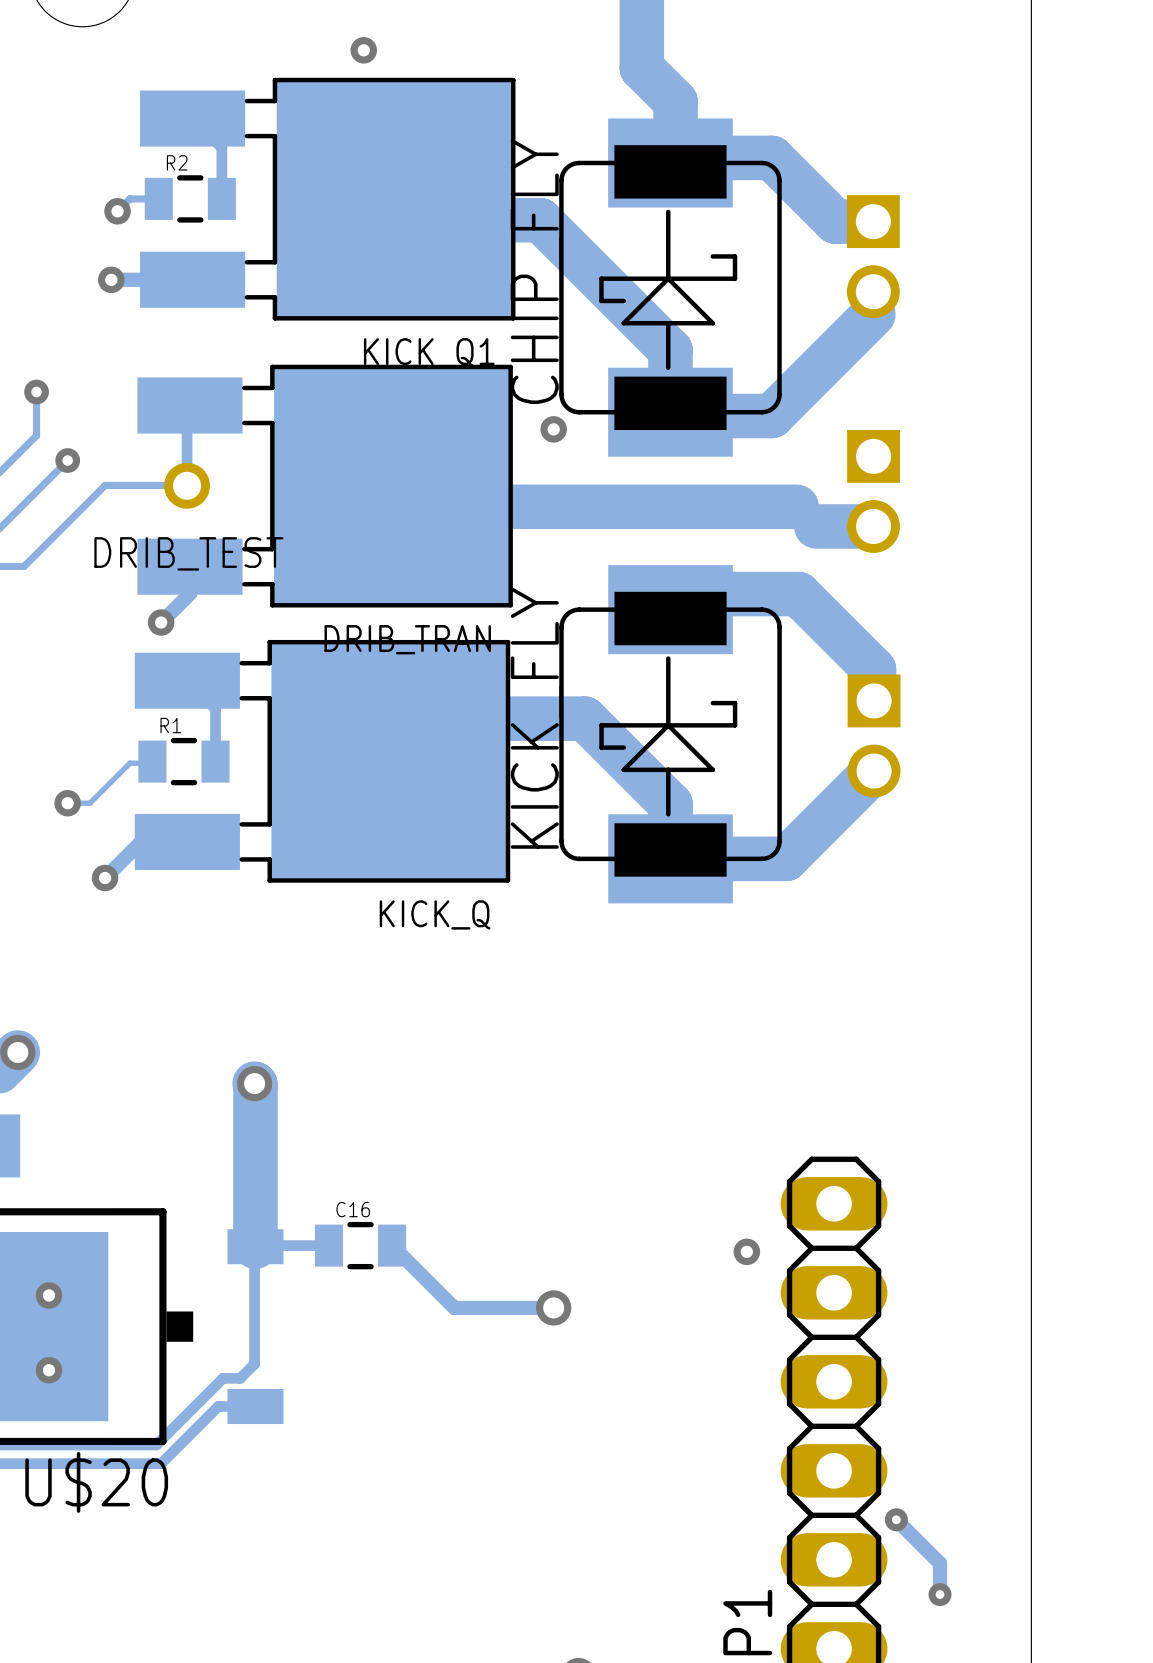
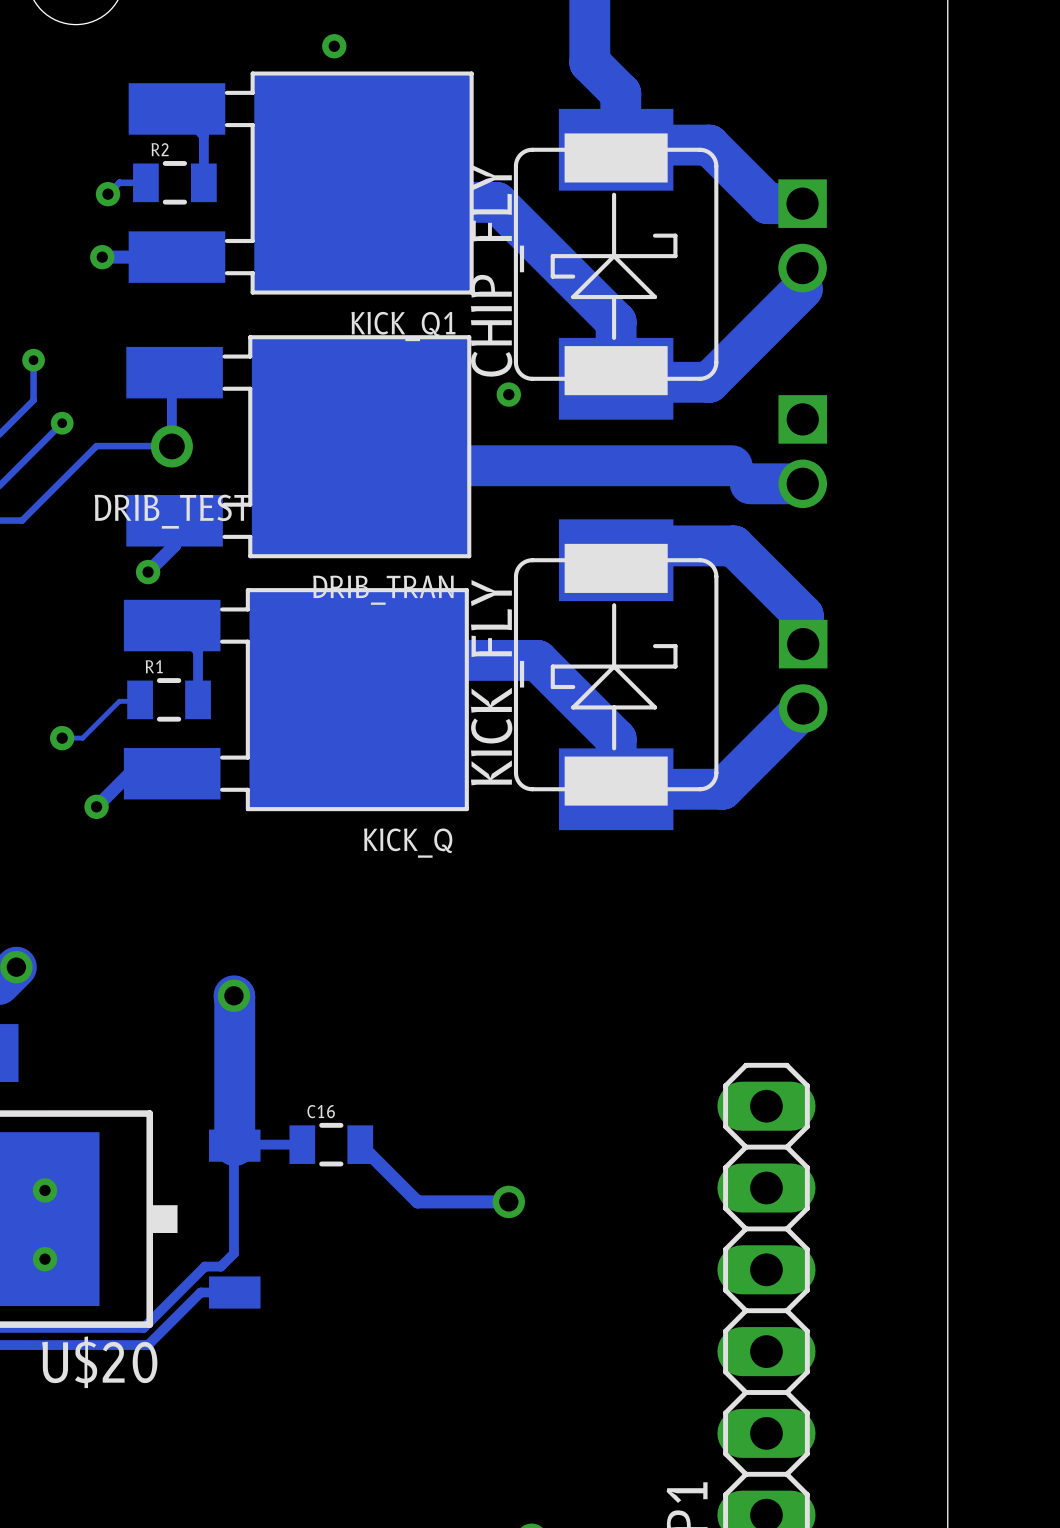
via: (746, 1251) -> none
track: (896, 1519) (940, 1563) (940, 1594) -> none
via: (896, 1519) -> none
via: (940, 1594) -> none

